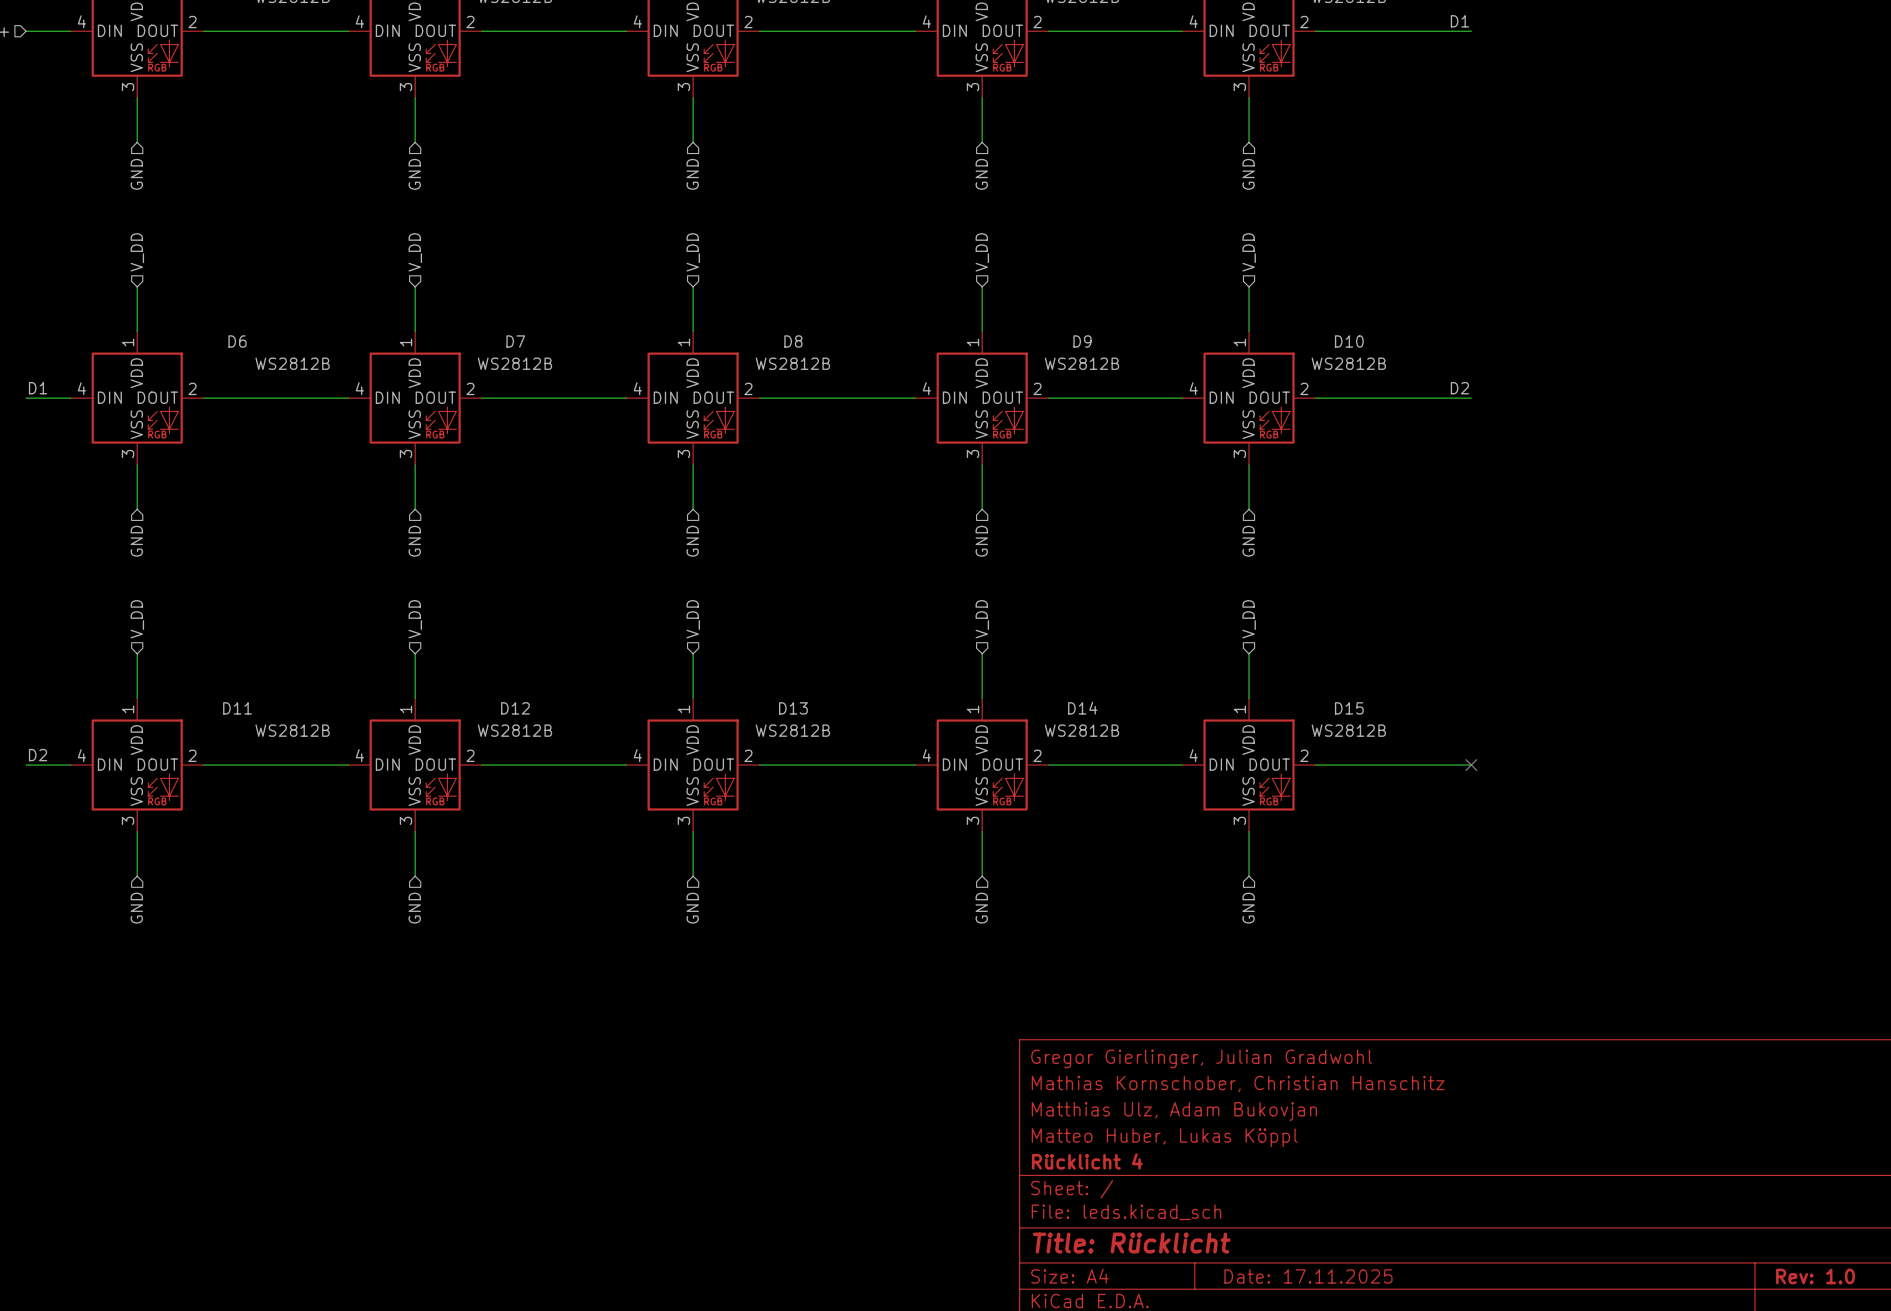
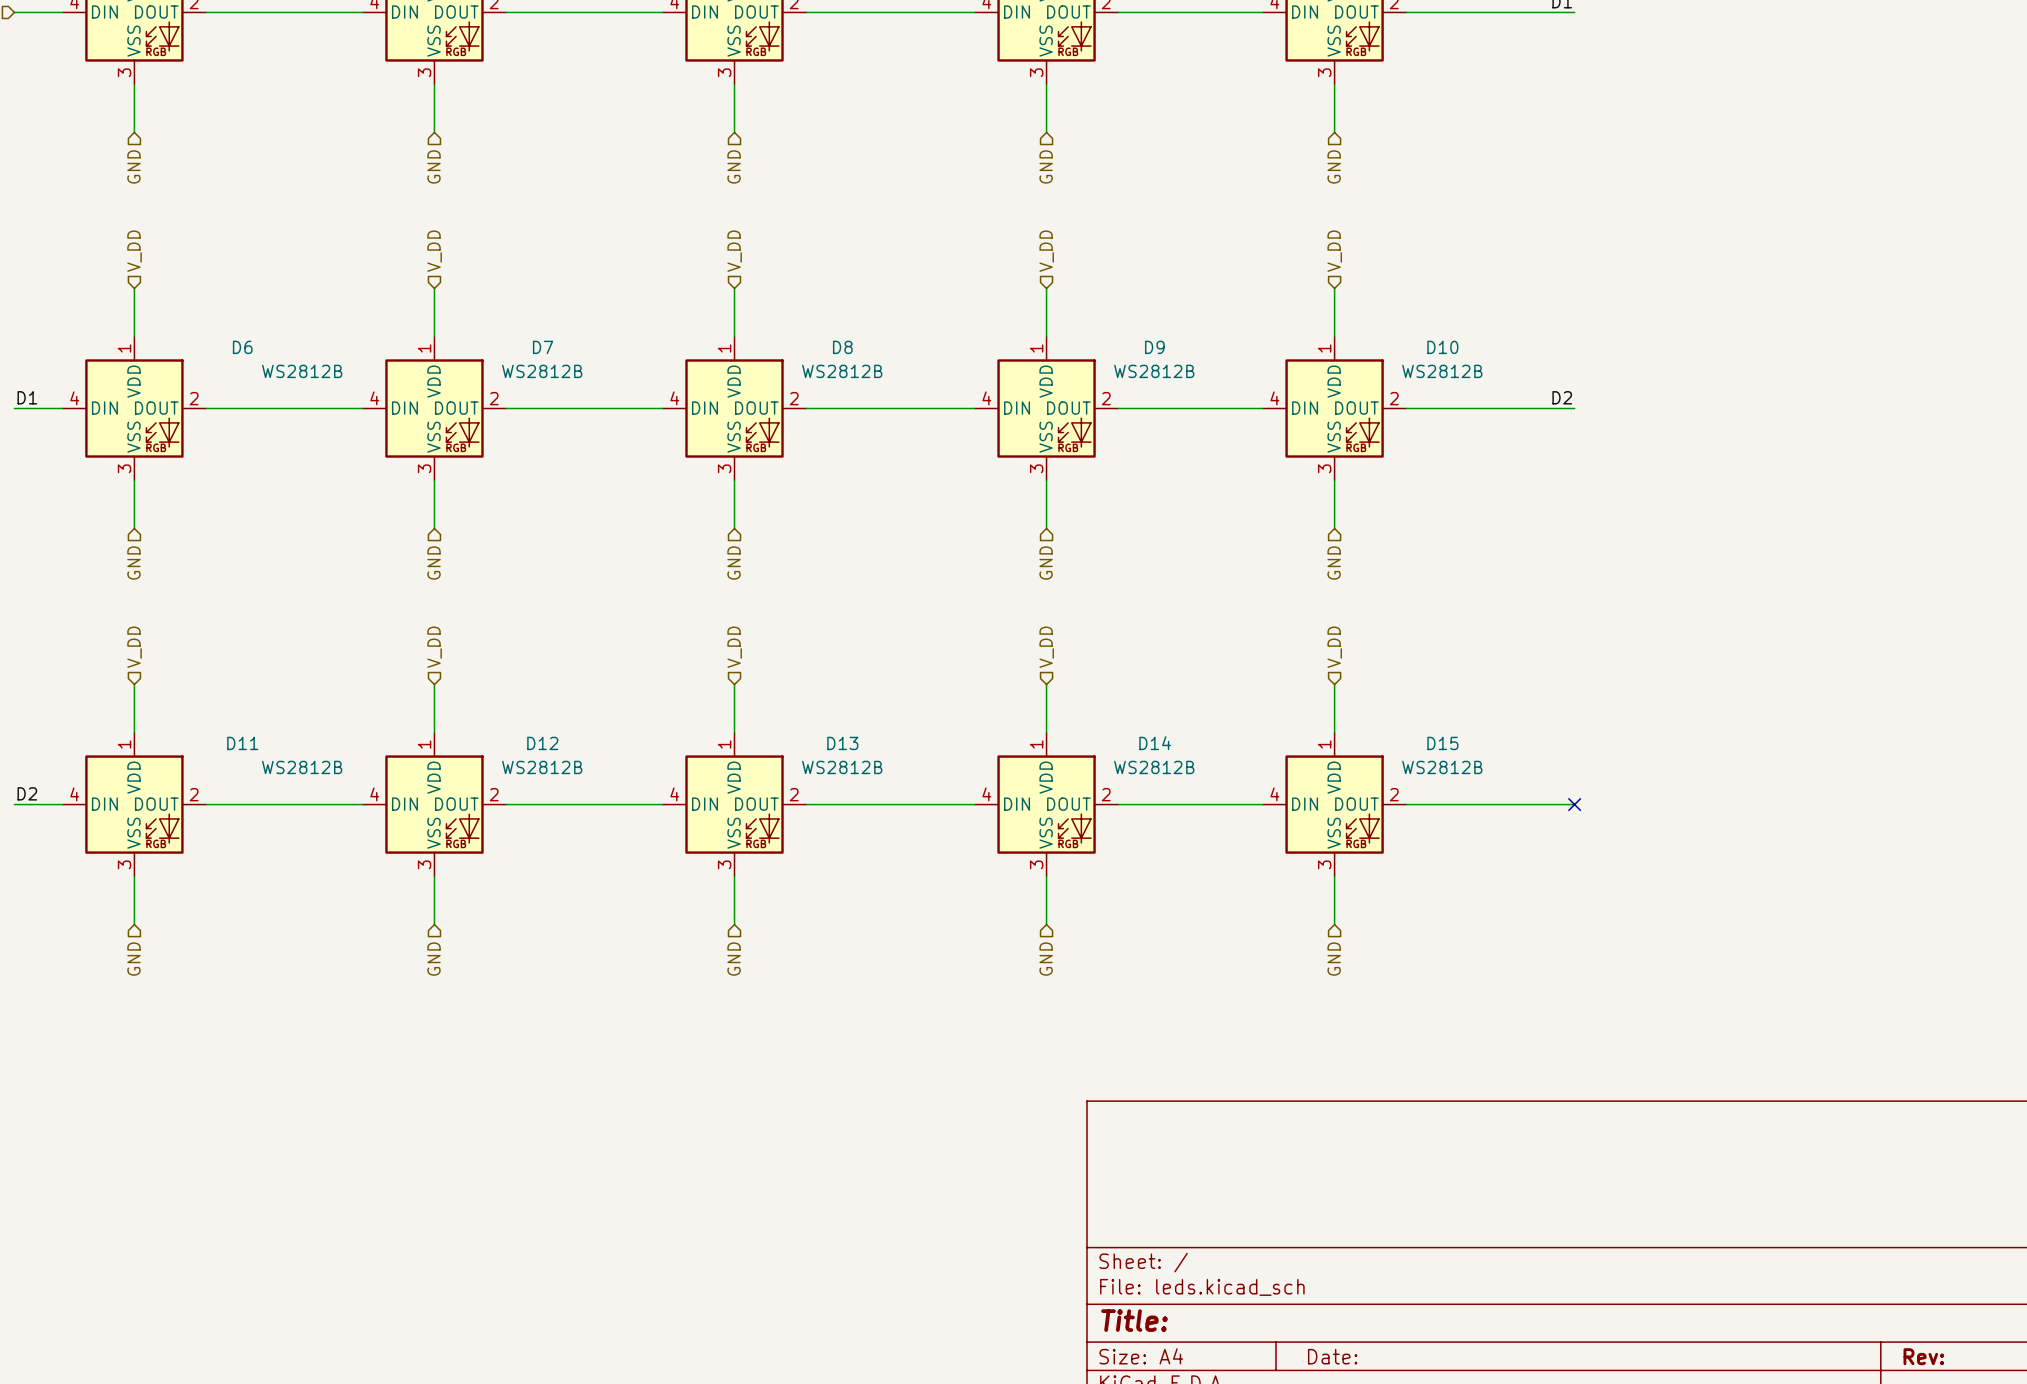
title block: Gregor Gierlinger, Julian Gradwohl (1201, 1058) -> none
title block: Mathias Kornschober, Christian Hanschitz (1238, 1083) -> none
title block: Matthias Ulz, Adam Bukovjan (1174, 1111) -> none
title block: Matteo Huber, Lukas Köppl (1164, 1137) -> none
title block: Rücklicht 4 (1087, 1161) -> none
title block: Title: Rücklicht (1131, 1243) -> Title: (1134, 1320)
title block: Date: 17.11.2025 (1308, 1276) -> Date: (1332, 1356)
title block: Rev: 1.0 (1815, 1276) -> Rev: (1923, 1356)

